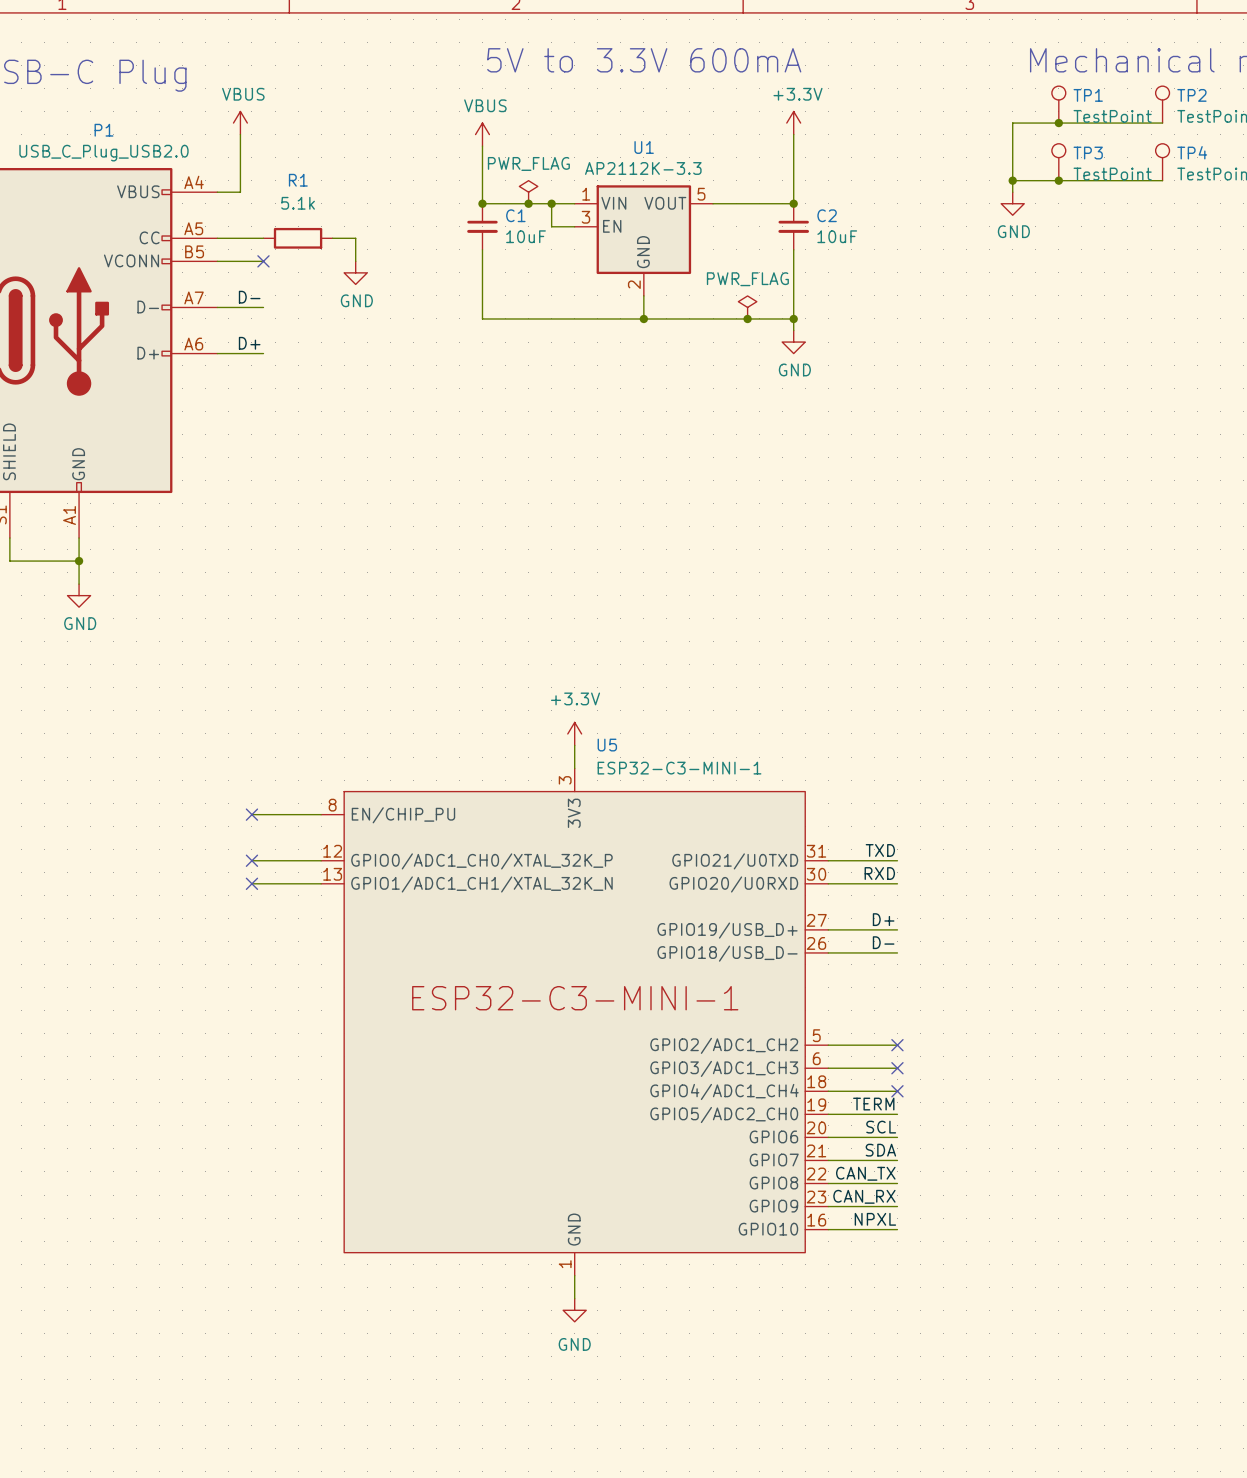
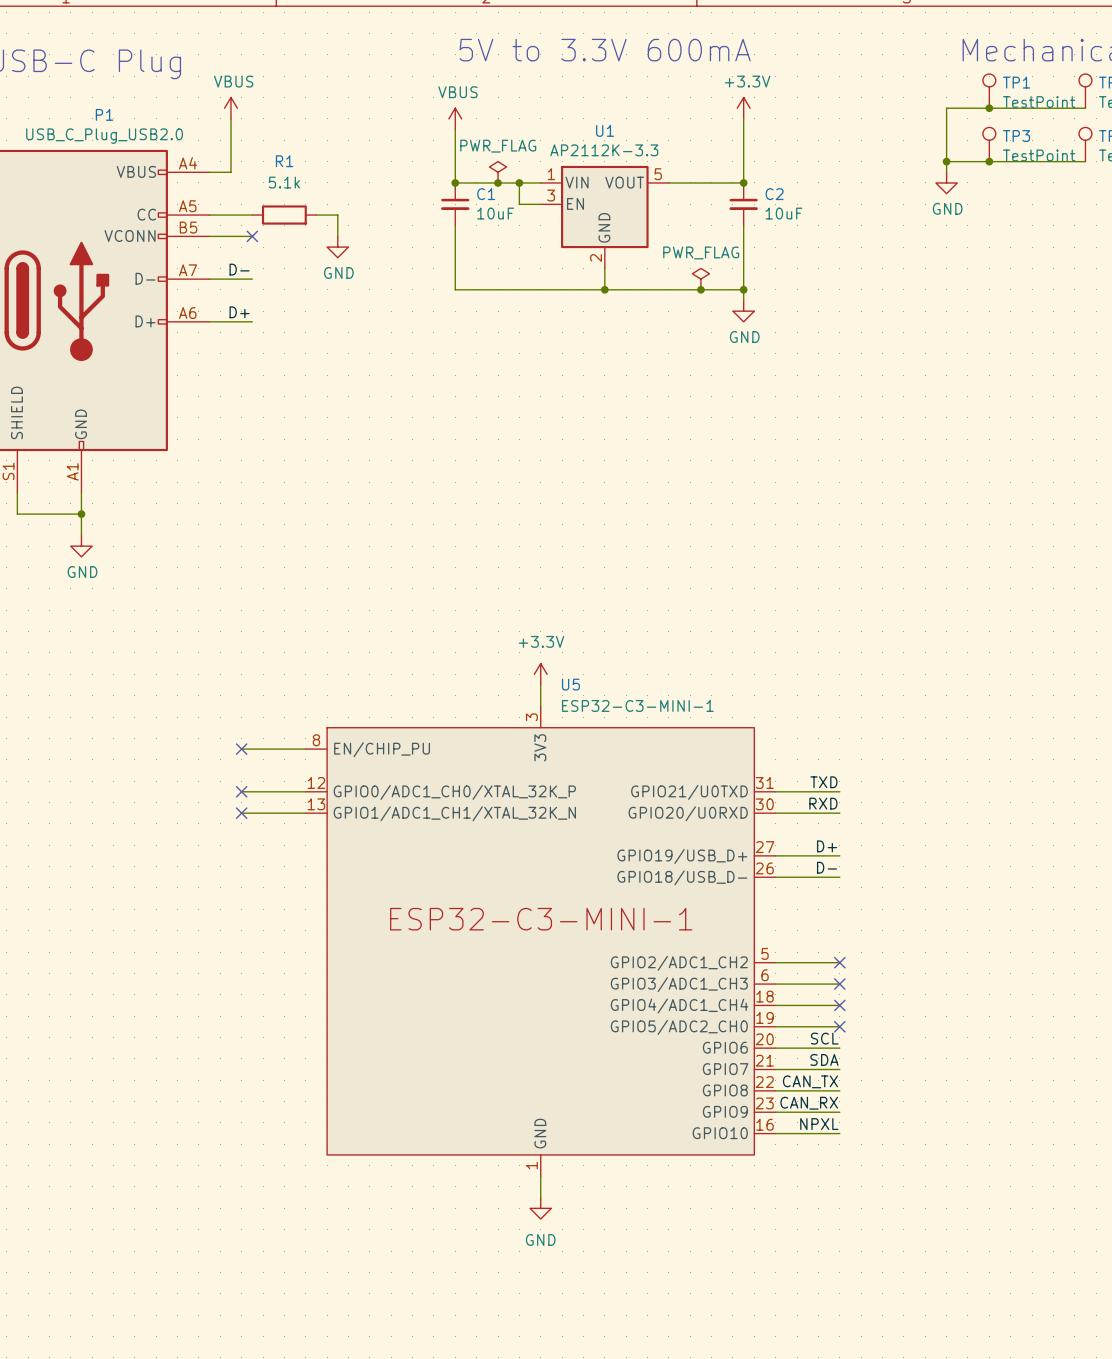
label: TERM (873, 1104) -> none
no-connect mark: none -> (839, 1026)

